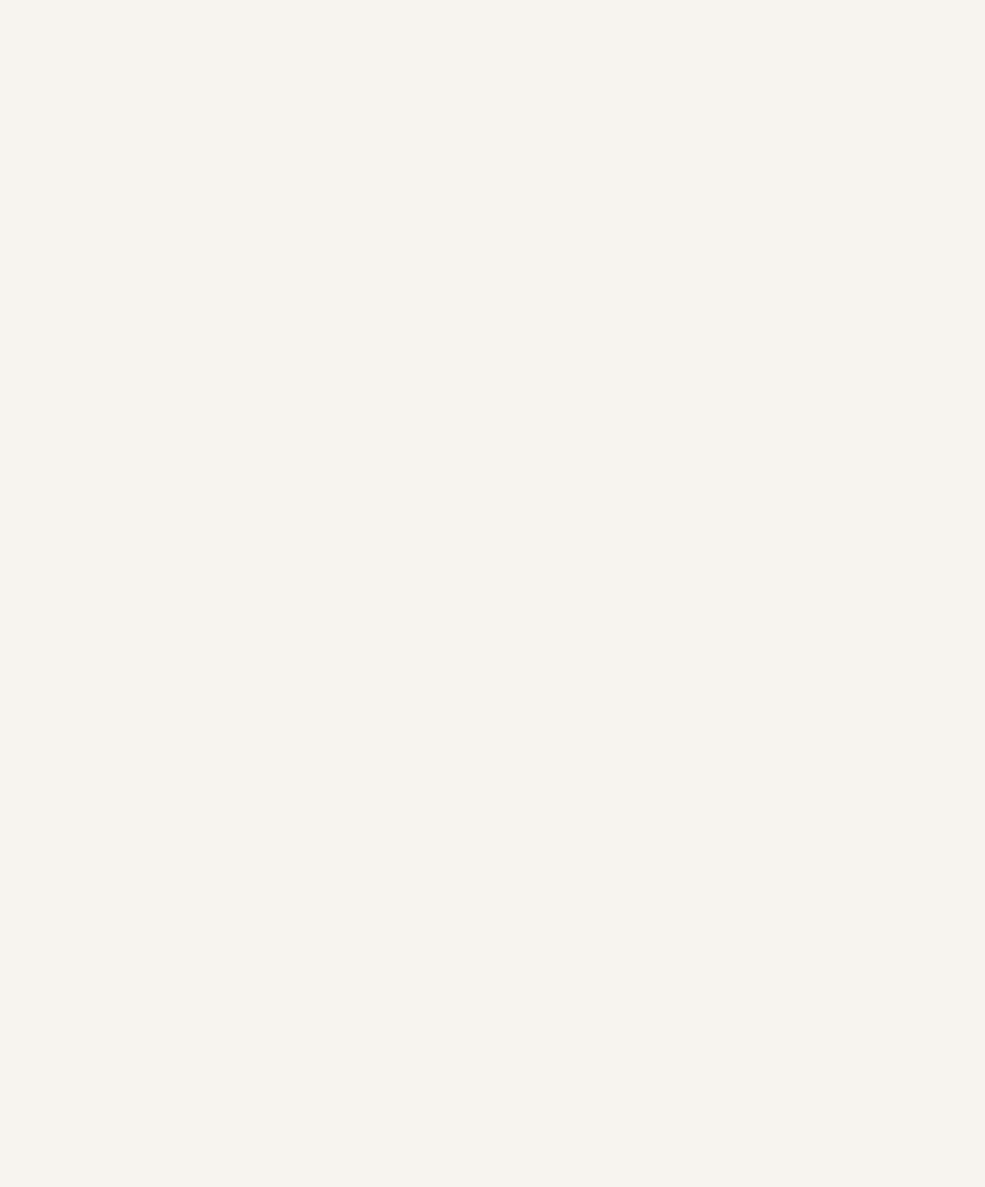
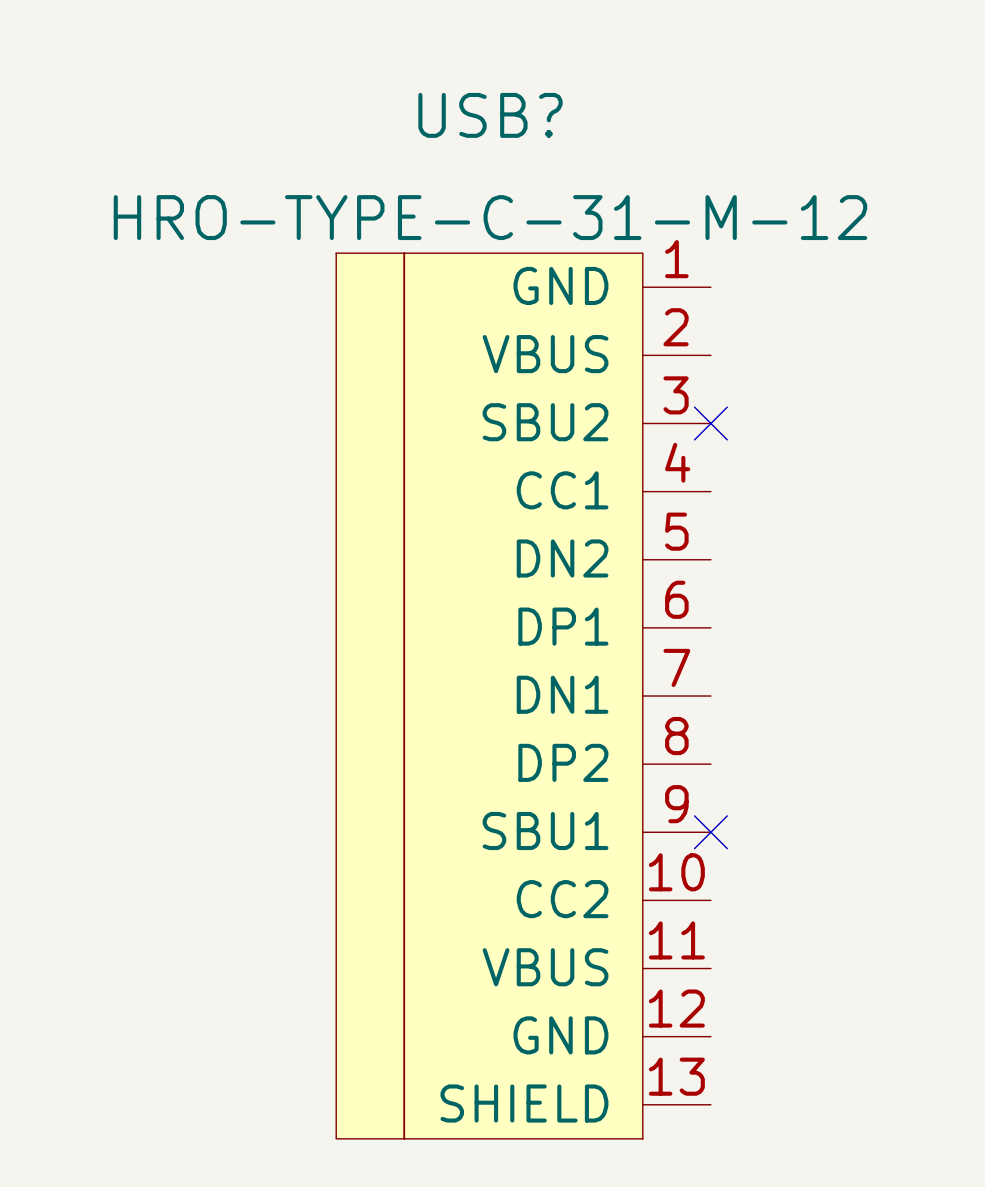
no-connect mark: none -> (710, 423)
USB?: none -> HRO-TYPE-C-31-M-12 (523, 696)
no-connect mark: none -> (710, 832)

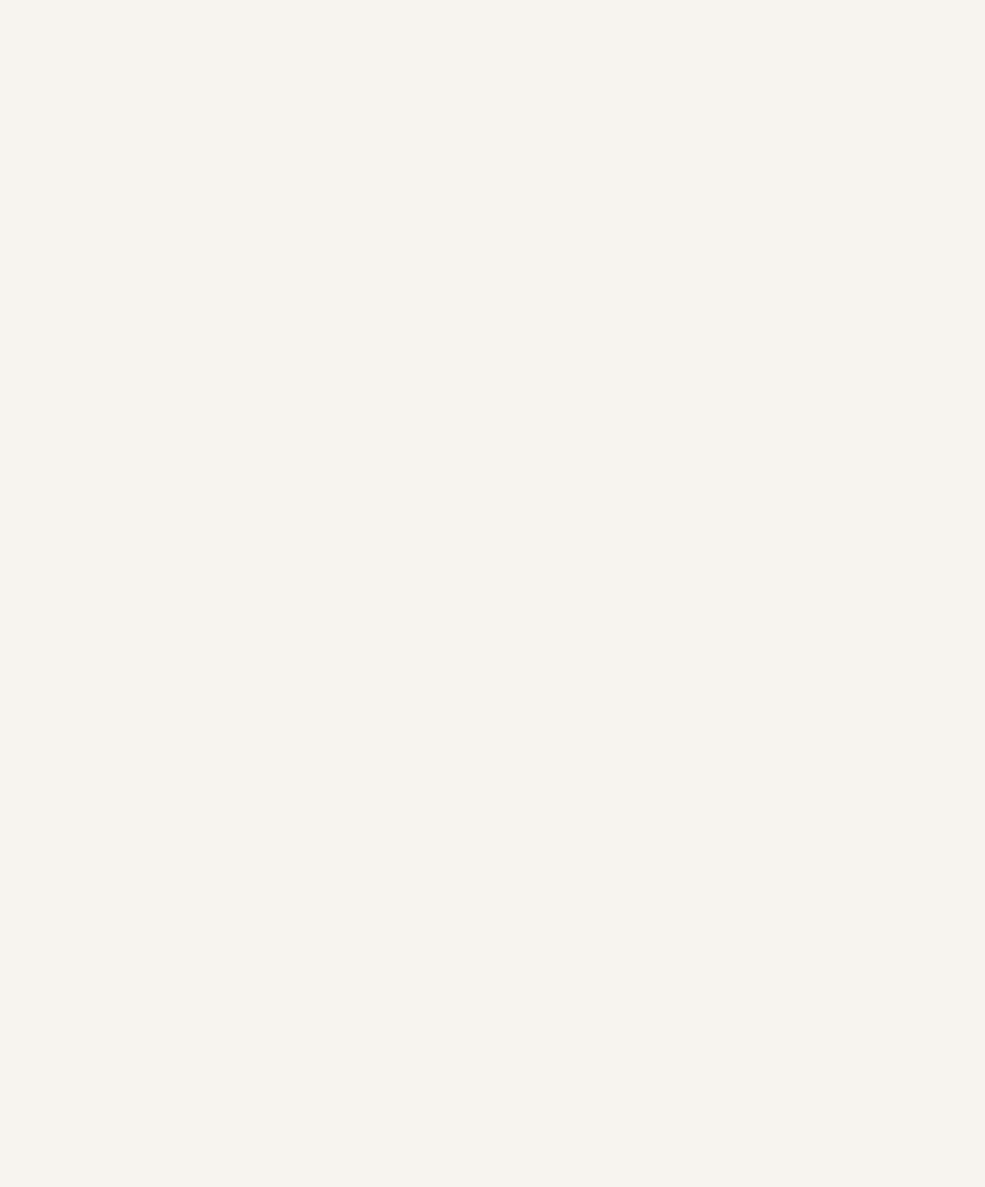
no-connect mark: (710, 423) -> none
USB?: HRO-TYPE-C-31-M-12 (523, 696) -> none
no-connect mark: (710, 832) -> none

